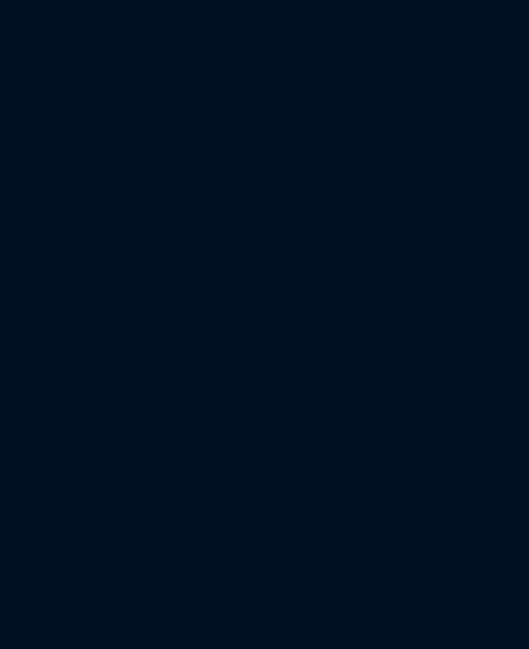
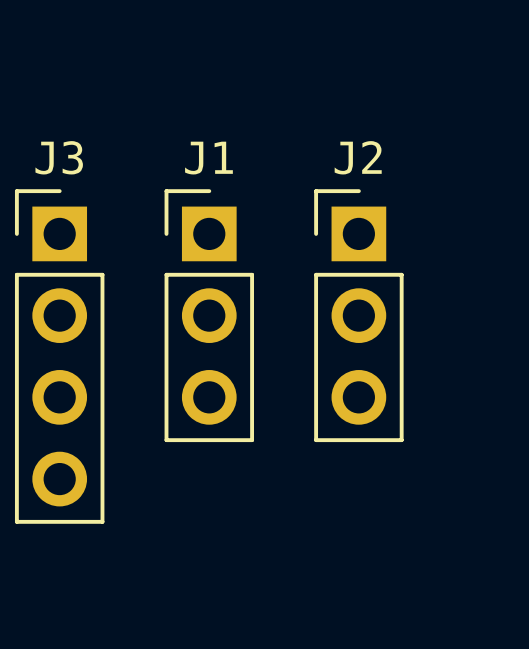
J1: none -> (209, 315)
J2: none -> (358, 315)
J3: none -> (59, 356)

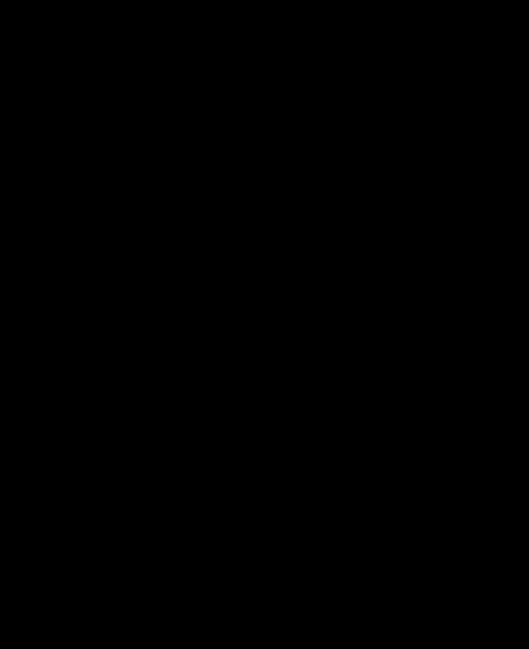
J1: (209, 315) -> none
J2: (358, 315) -> none
J3: (59, 356) -> none

